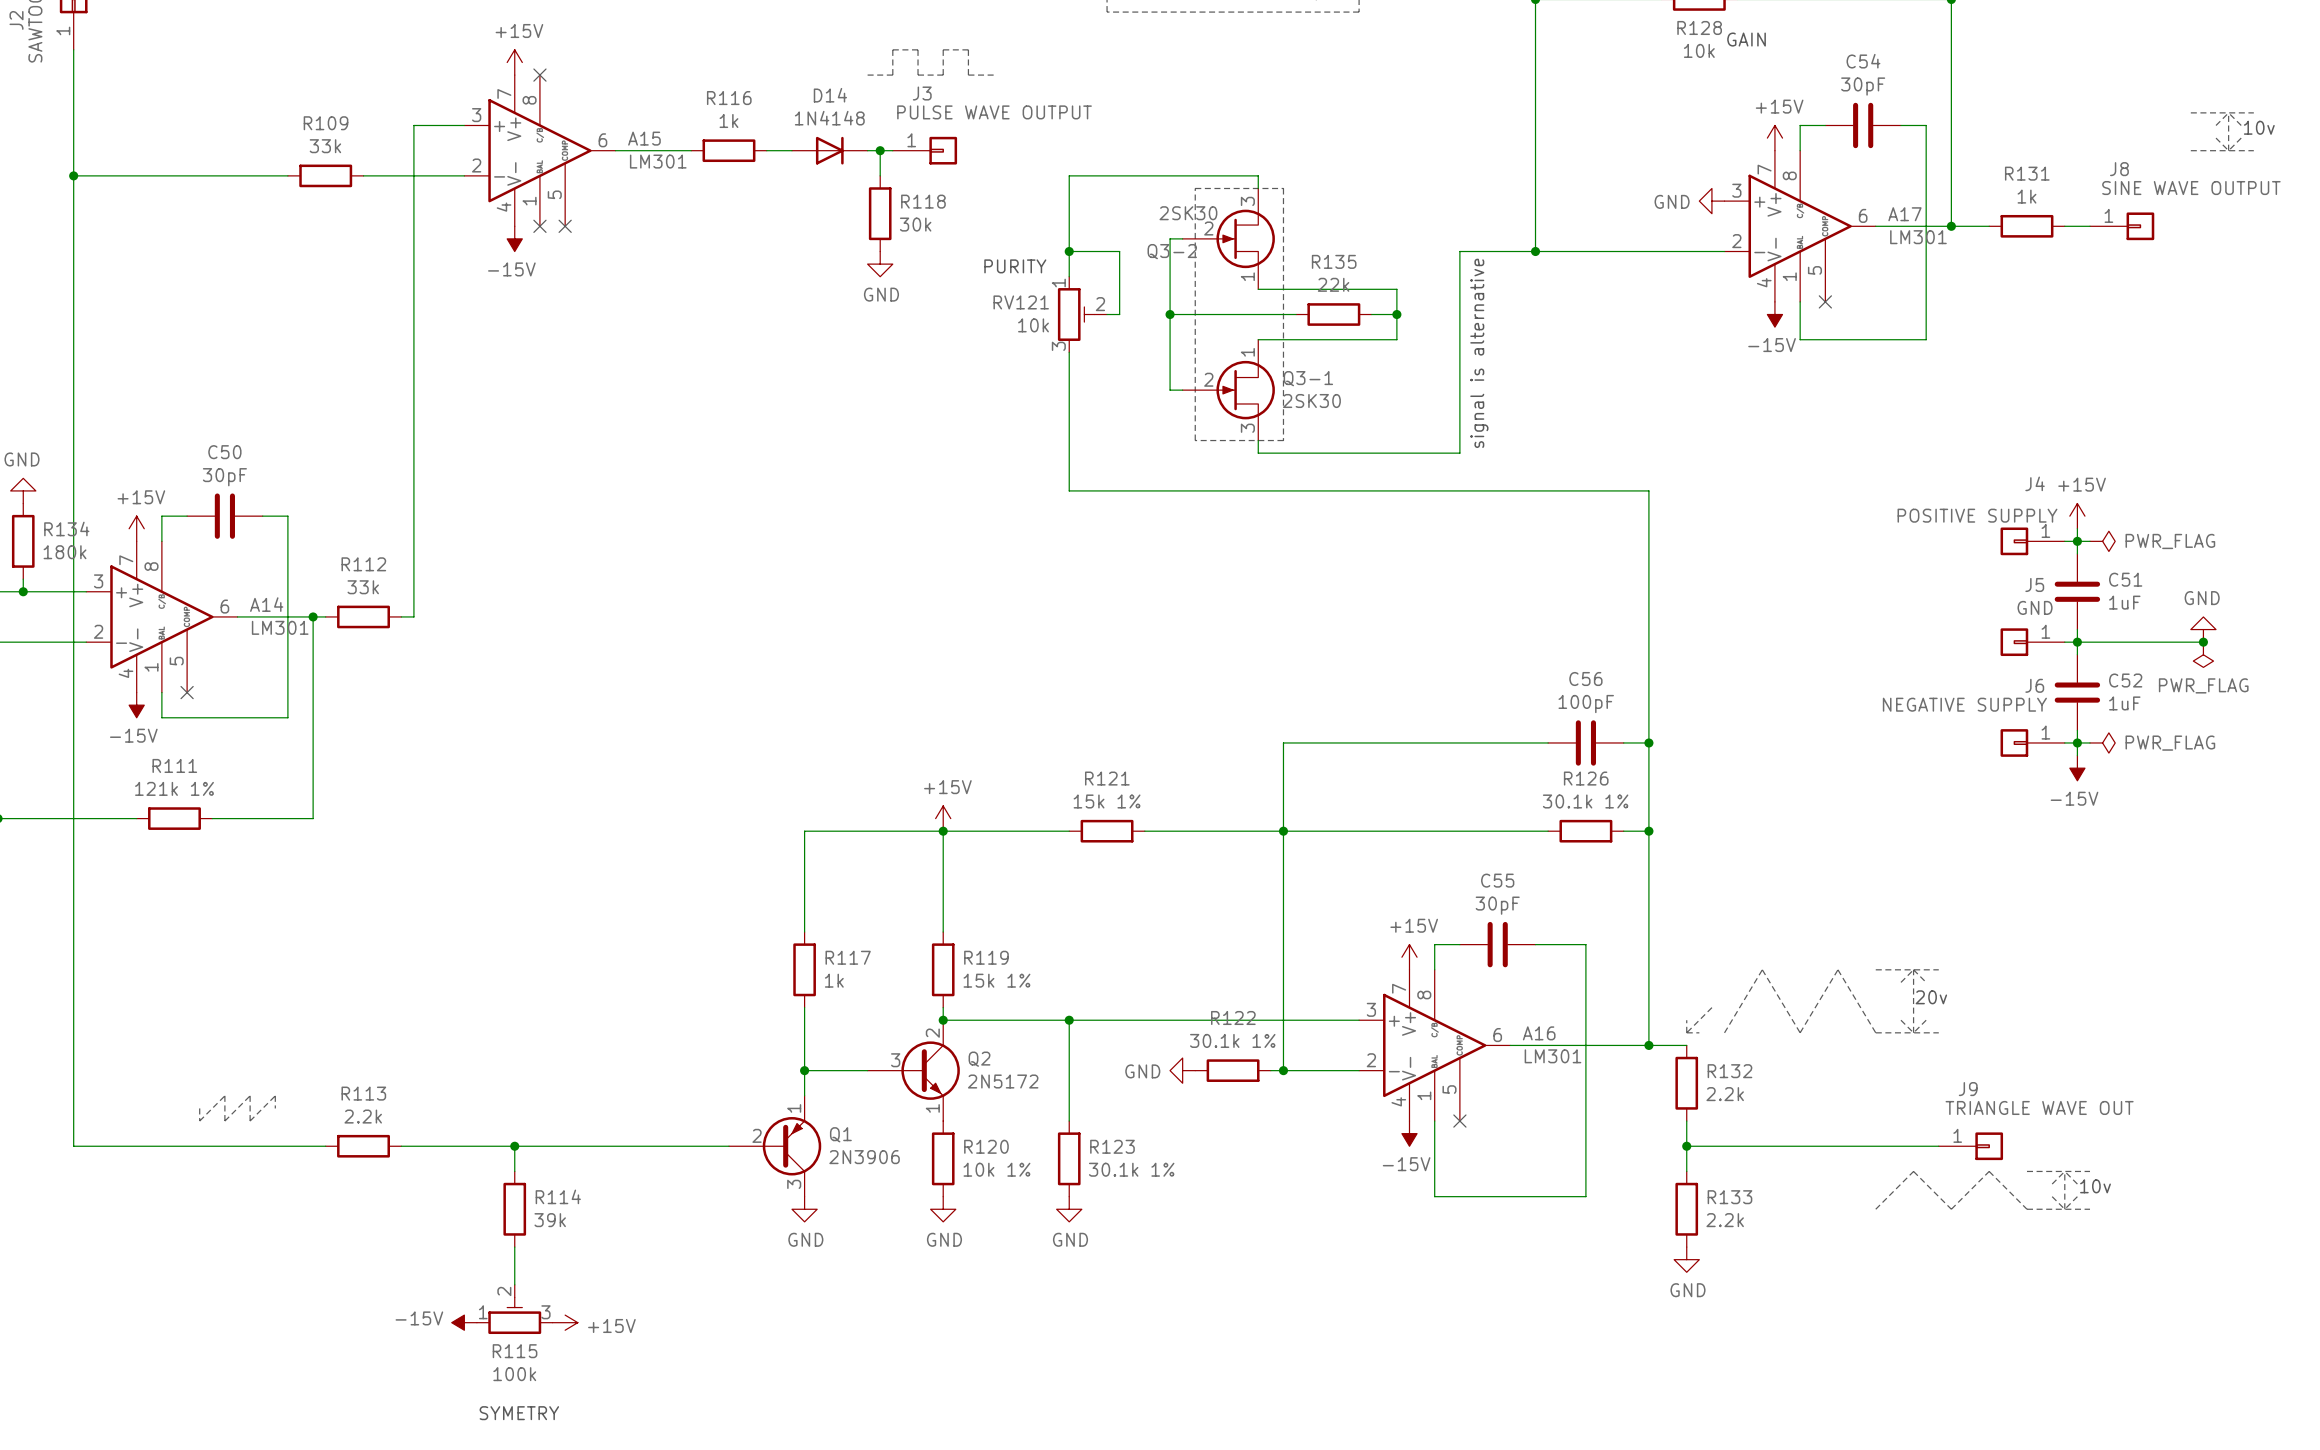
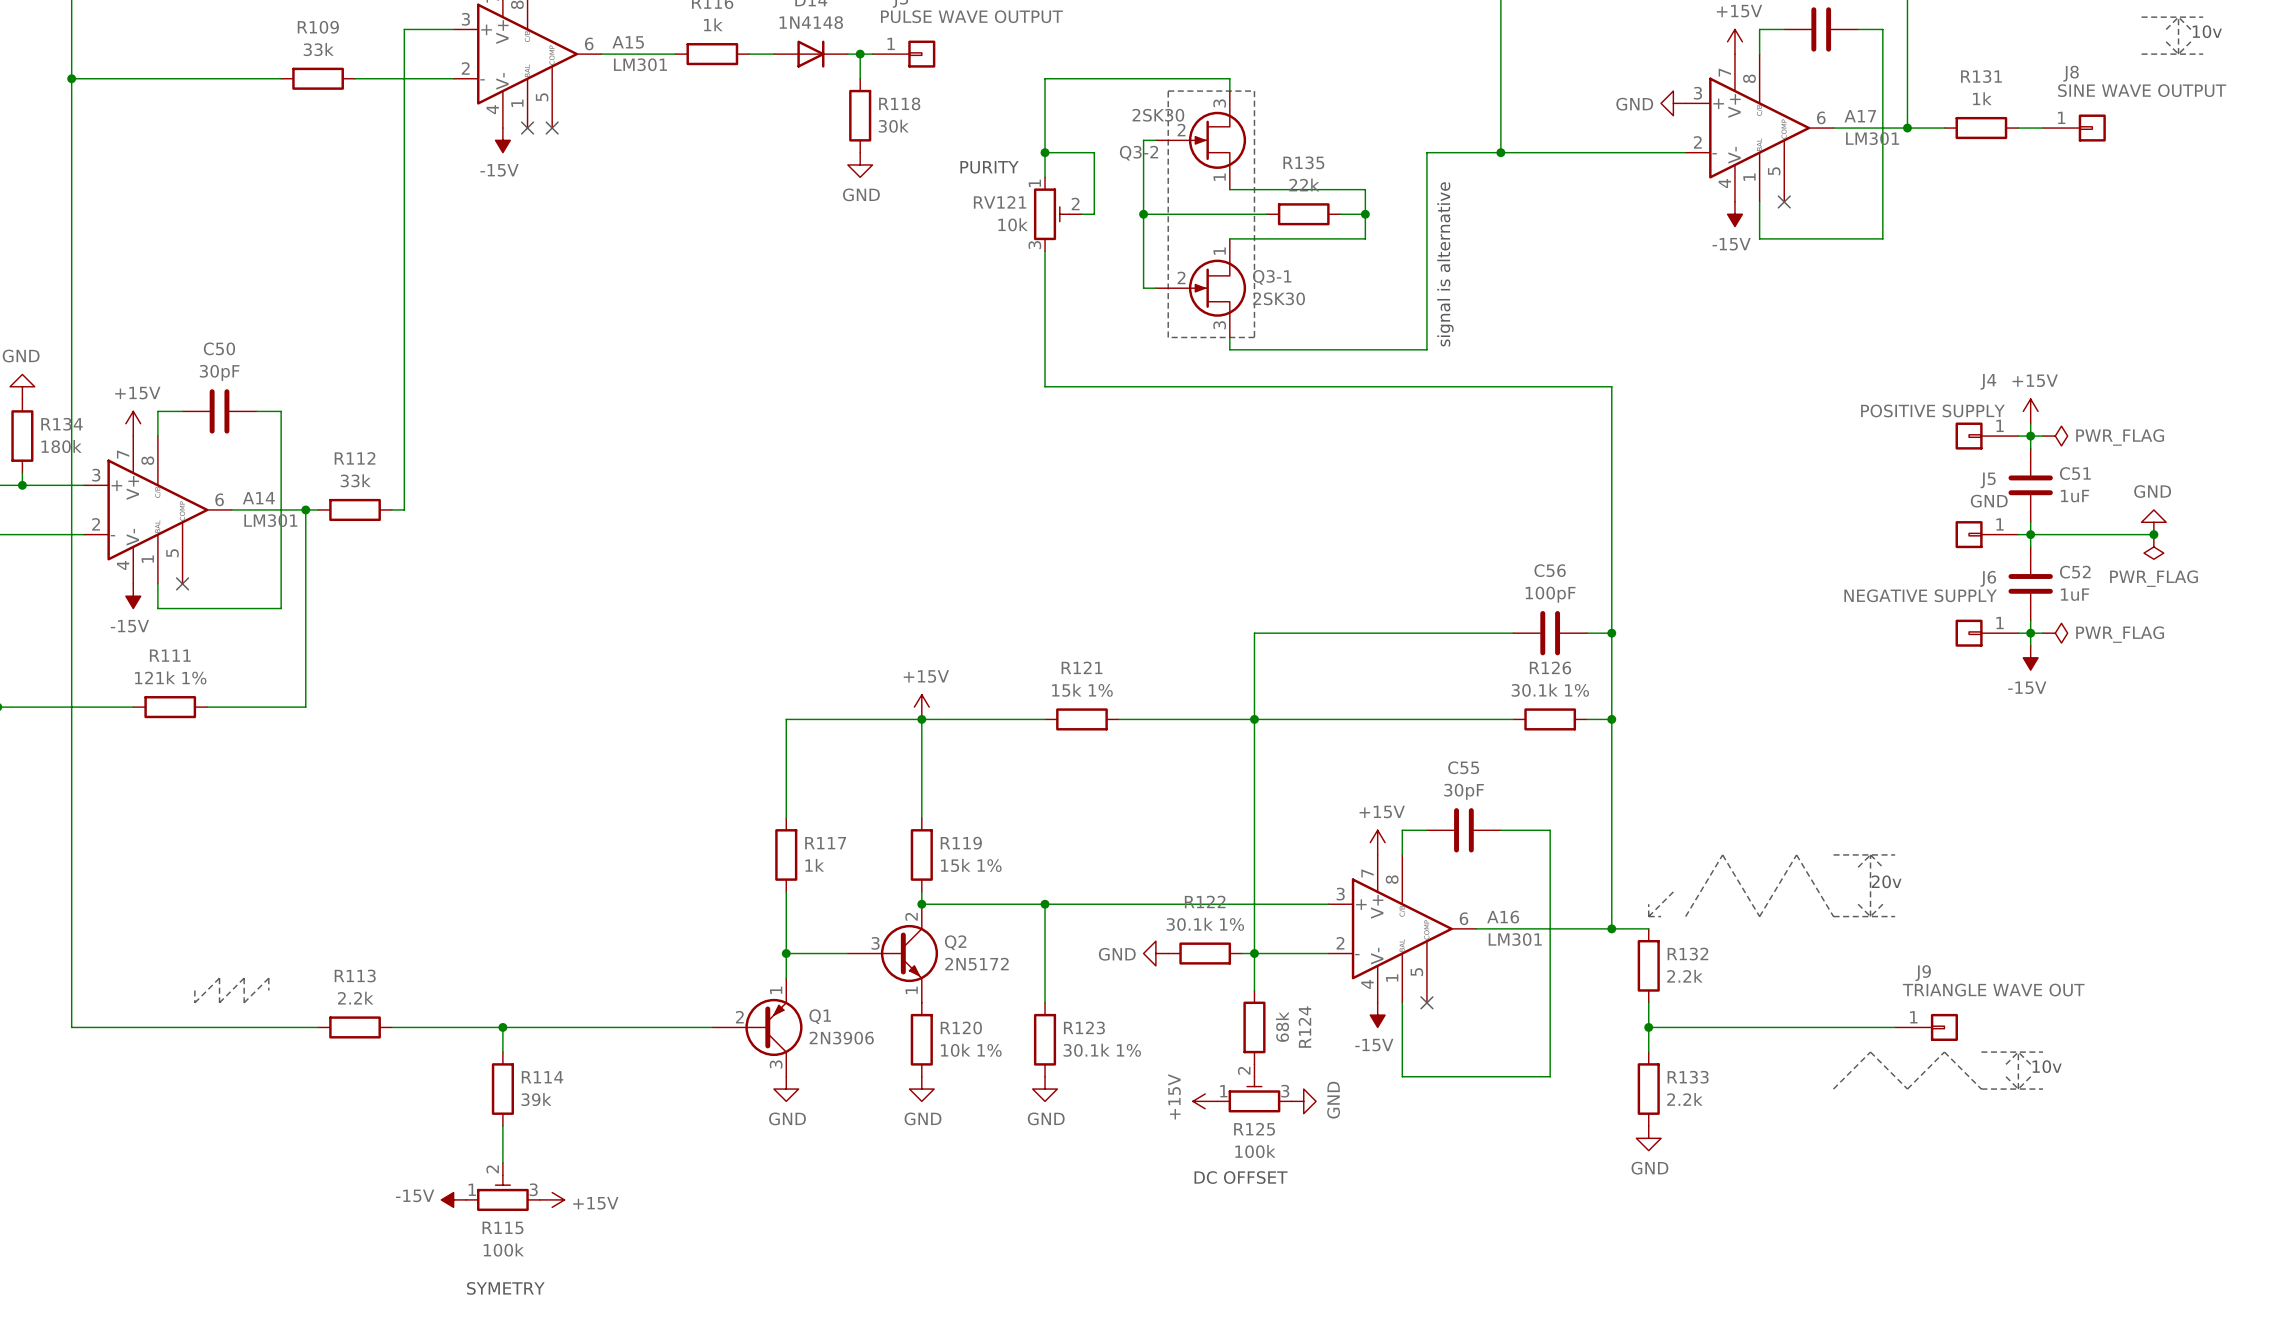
wire: none -> (1254, 953) (1254, 990)
R124: none -> 68k (1254, 1027)
R125: none -> 100k (1254, 1088)
power symbol: none -> +15V (1205, 1101)
power symbol: none -> GND (1303, 1101)
text: none -> DC OFFSET (1241, 1177)

